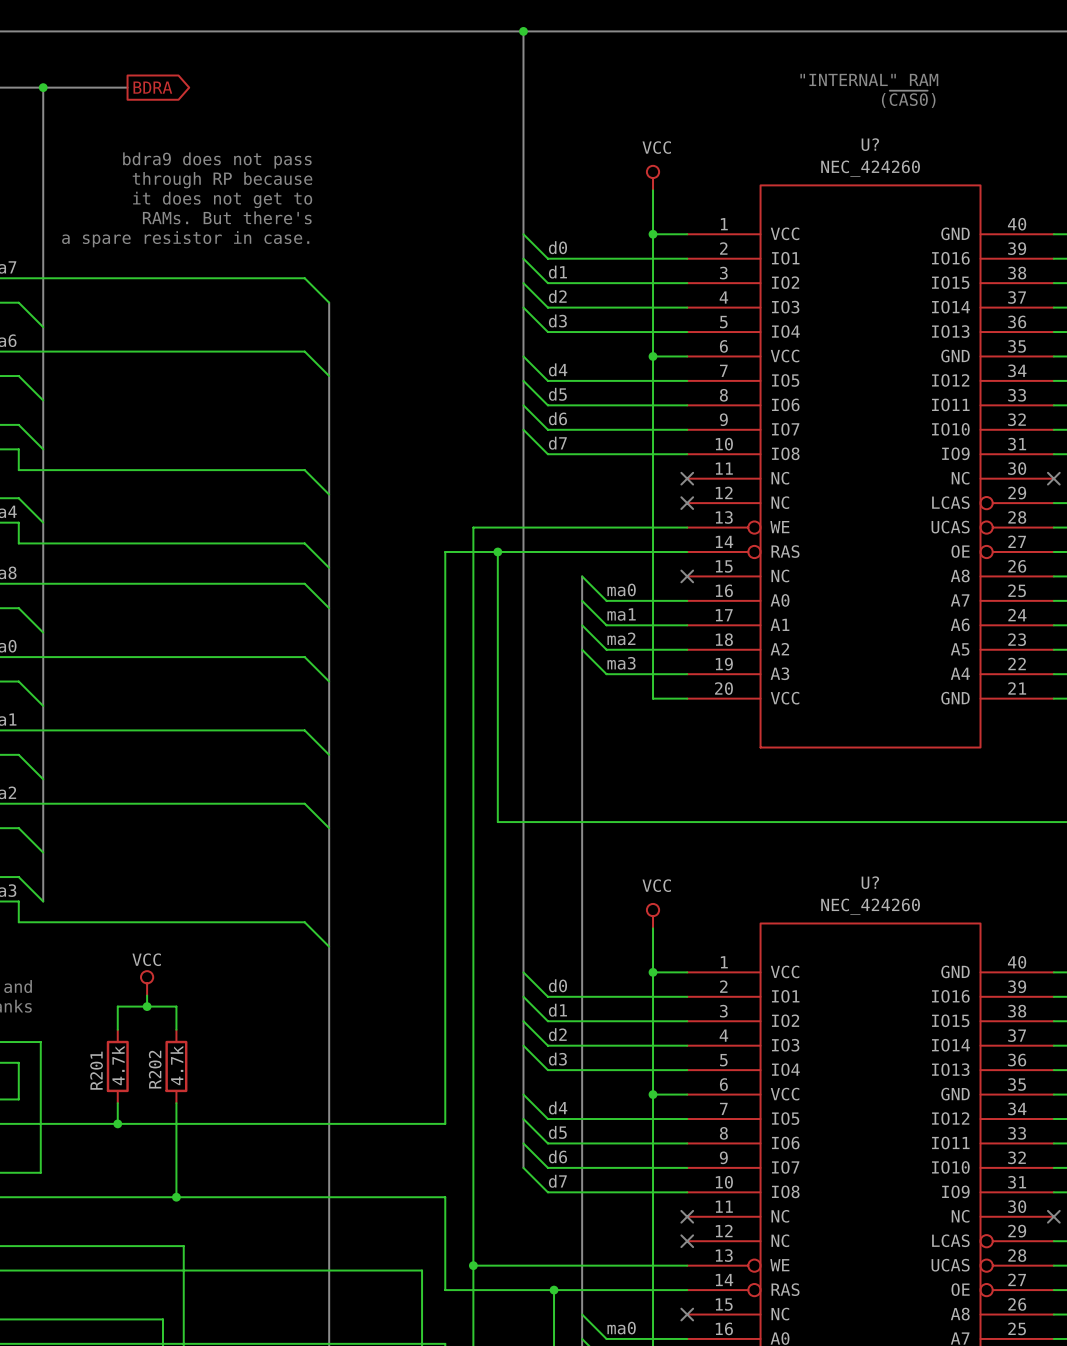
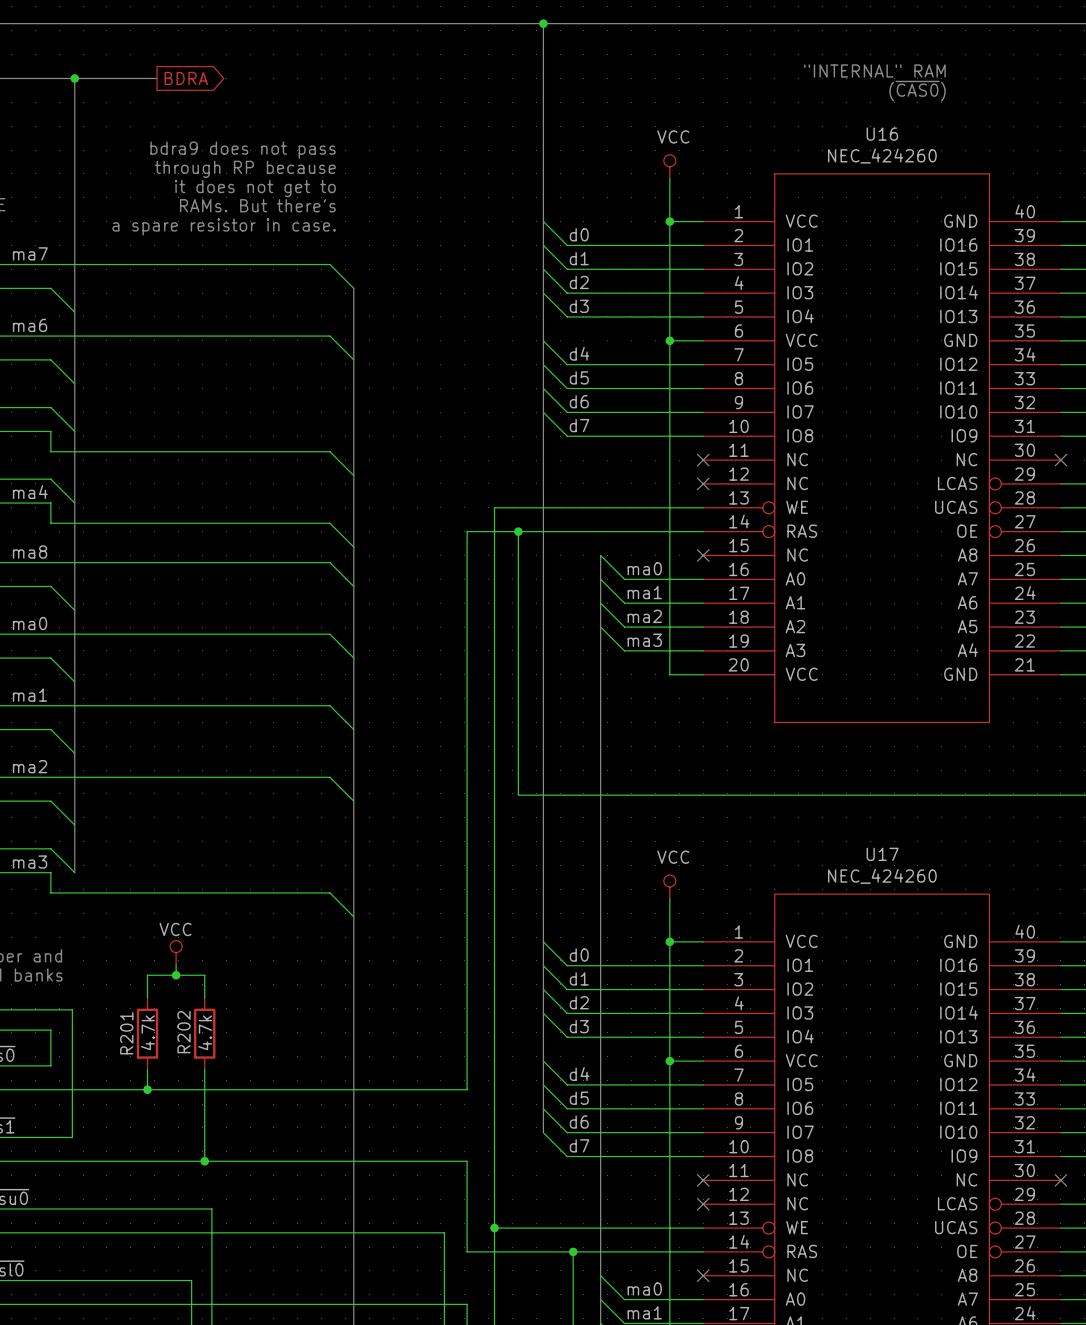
U? name: U? (870, 144) -> U16 (882, 134)
U? name: U? (870, 882) -> U17 (882, 854)

